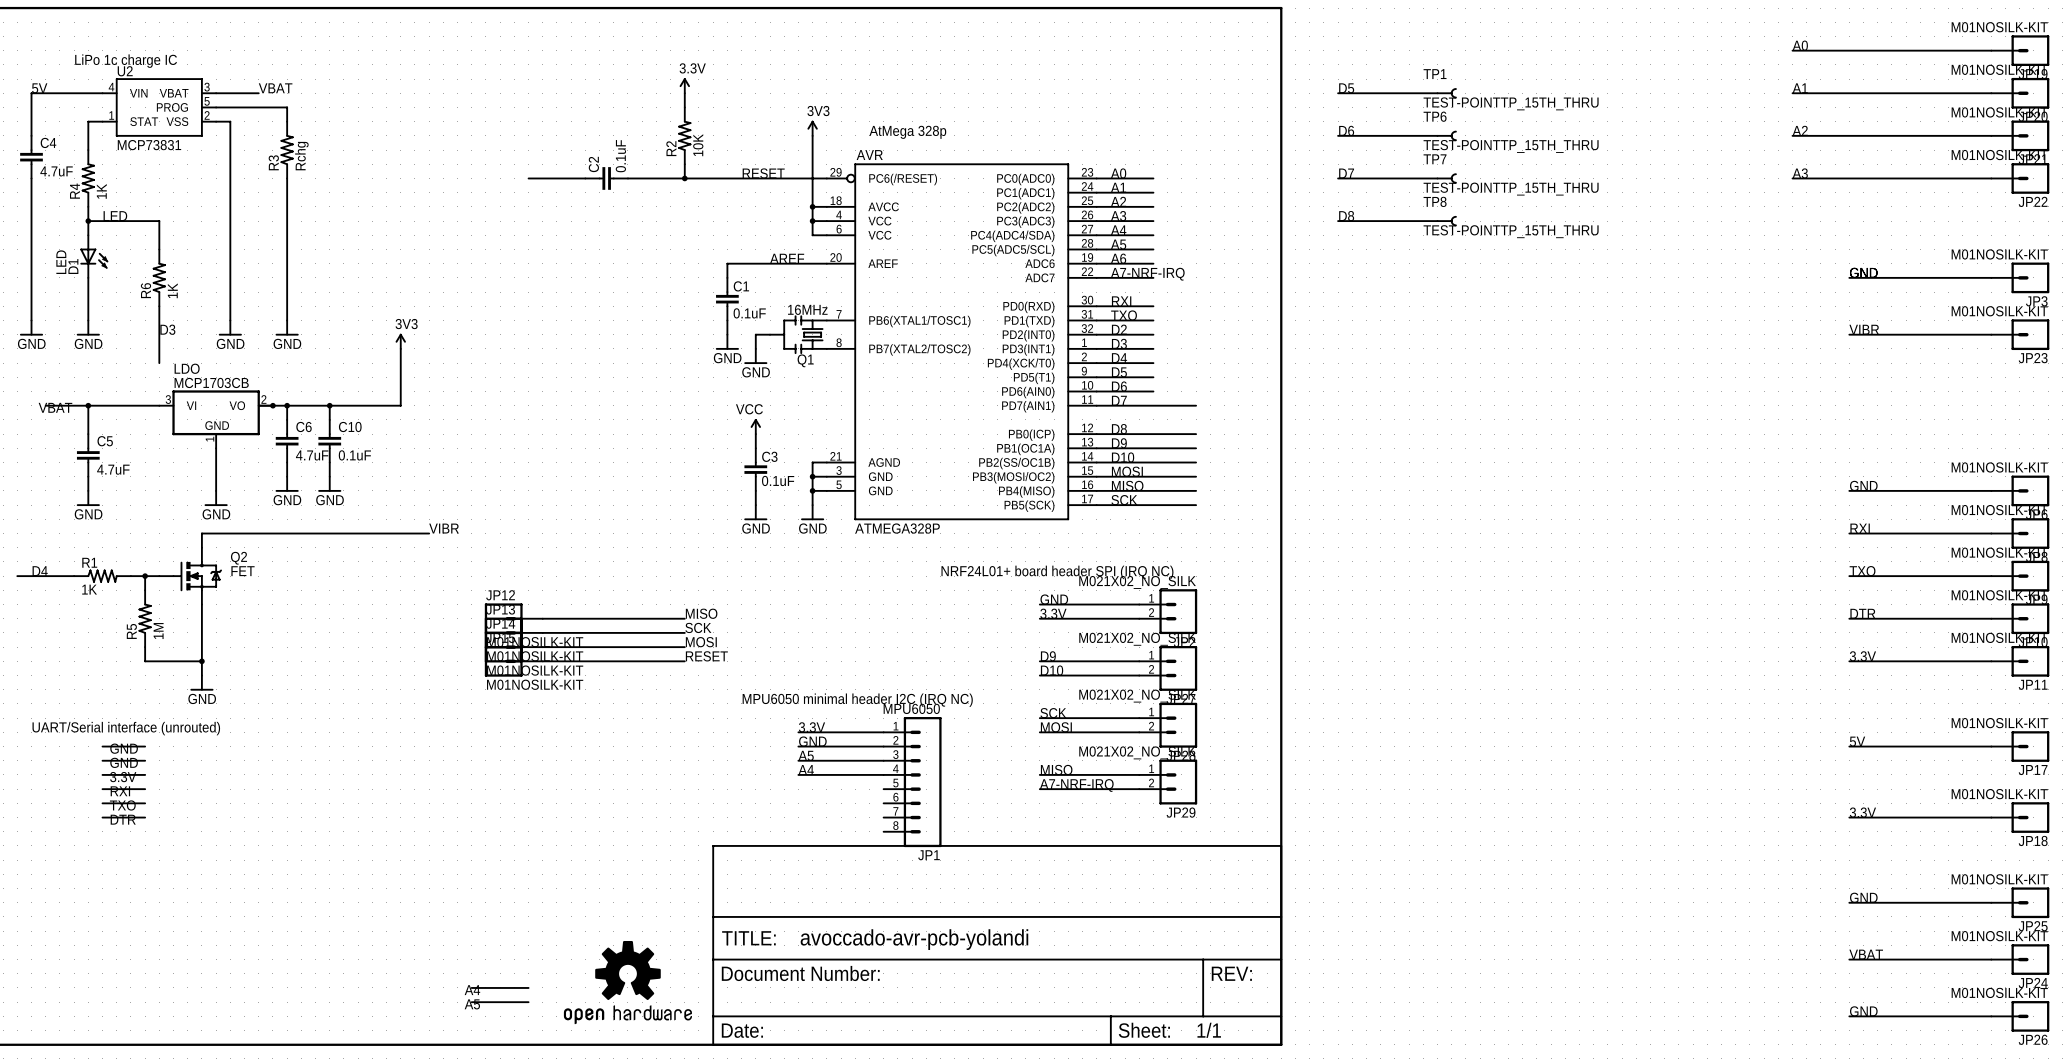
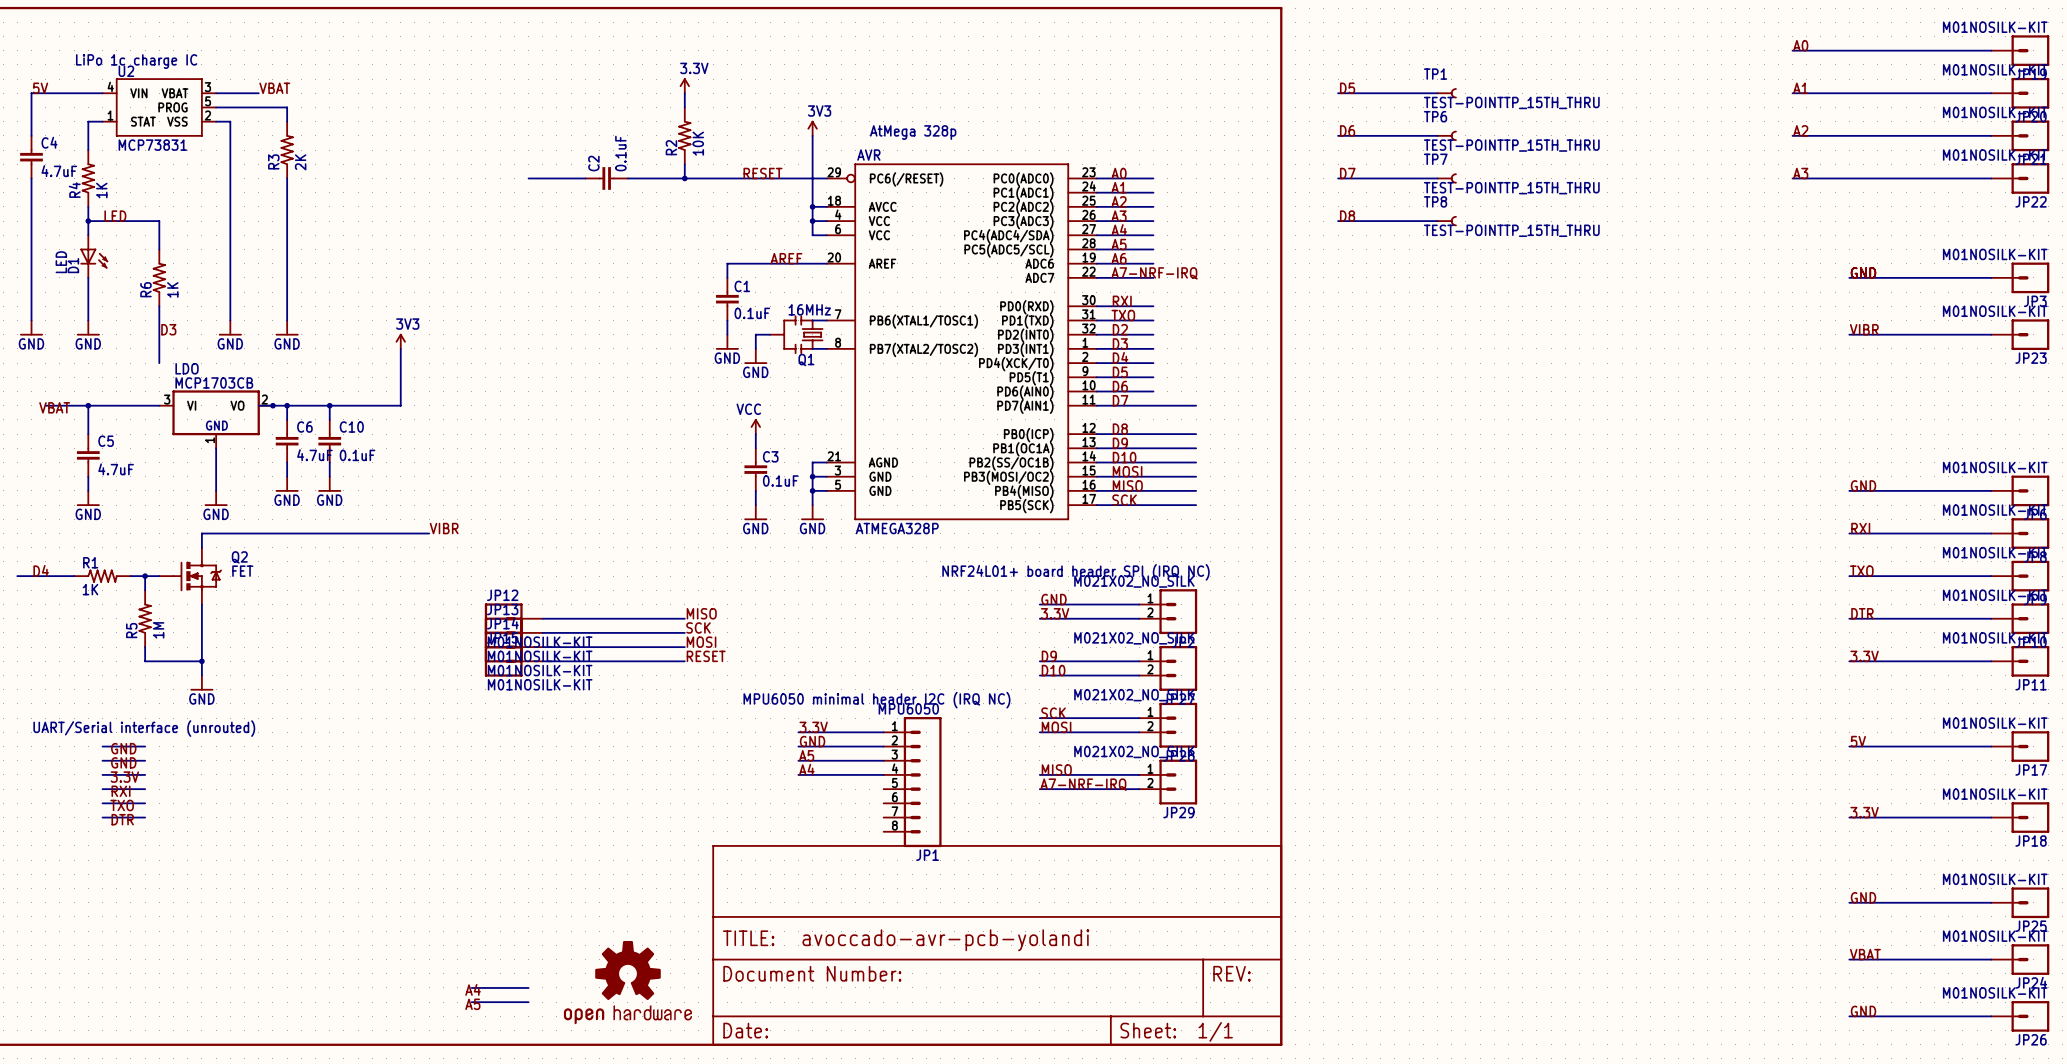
R3 value: Rchg (301, 156) -> 2K (300, 162)

